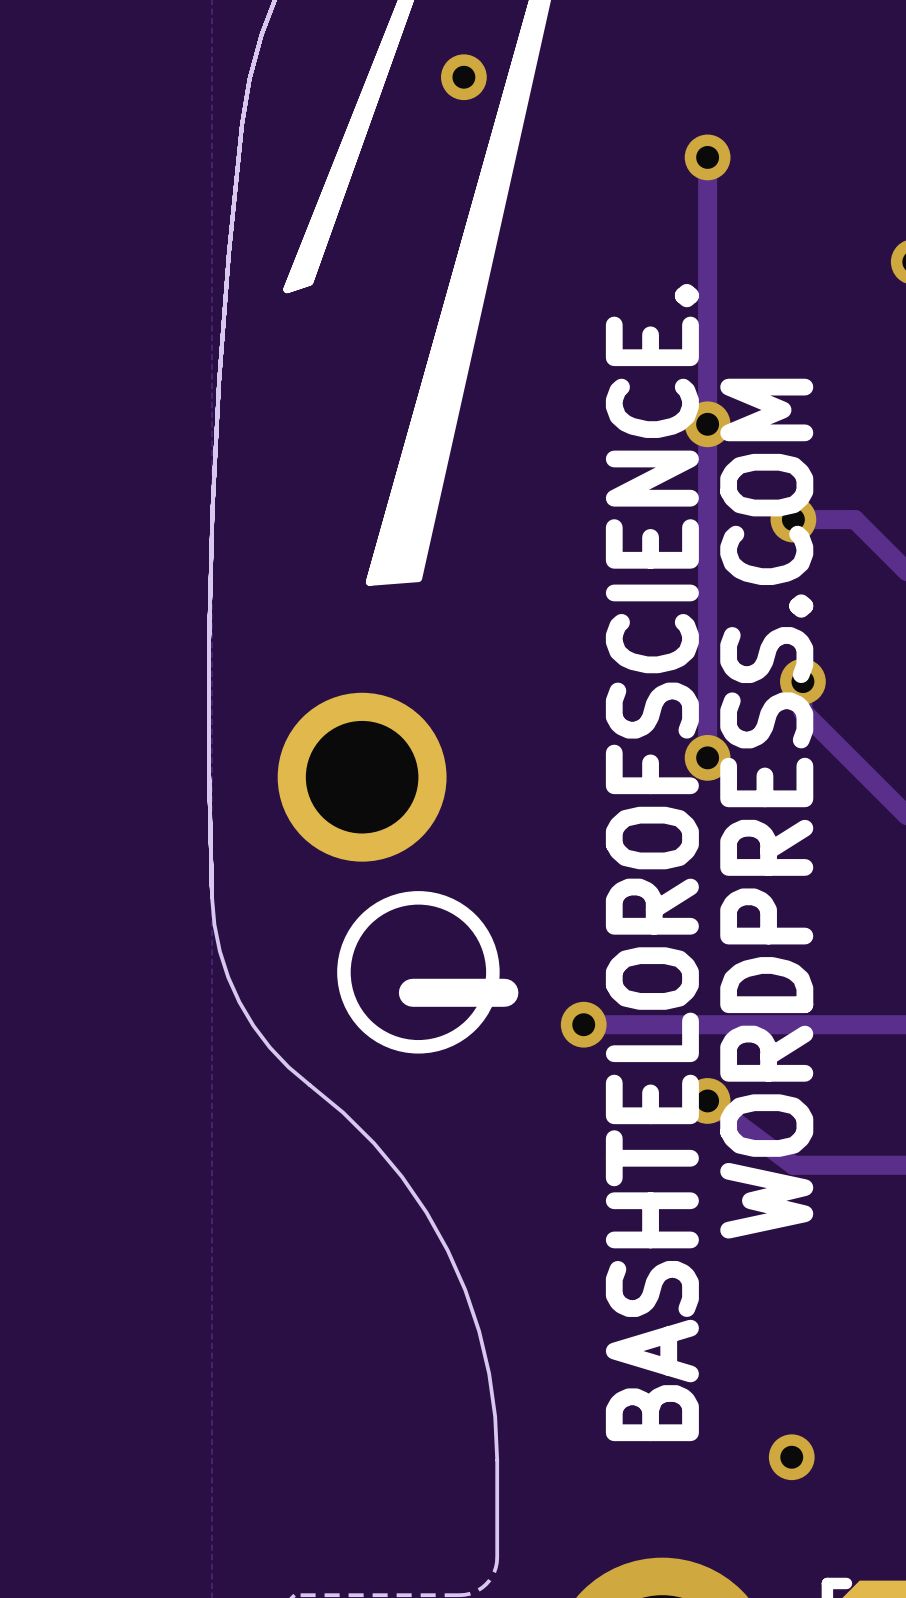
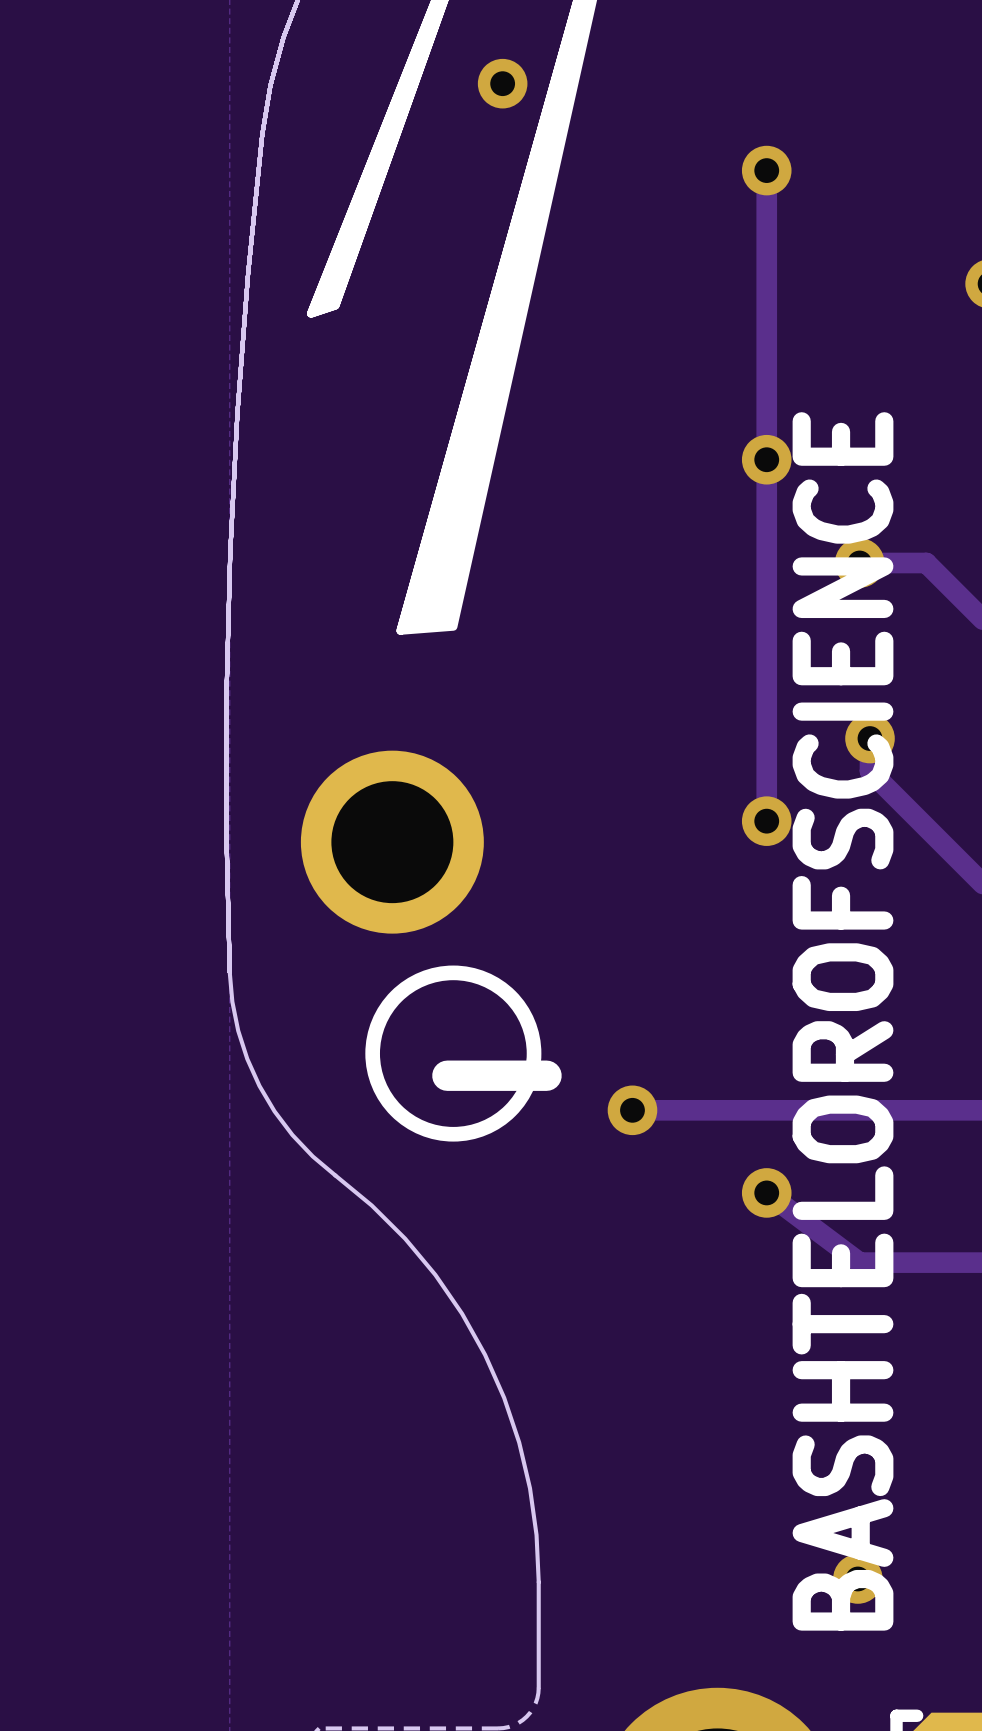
text: WORDPRESS.COM (766, 808) -> BASHTELOROFSCIENCE (843, 1021)
text: BASHTELOROFSCIENCE. (652, 862) -> none

